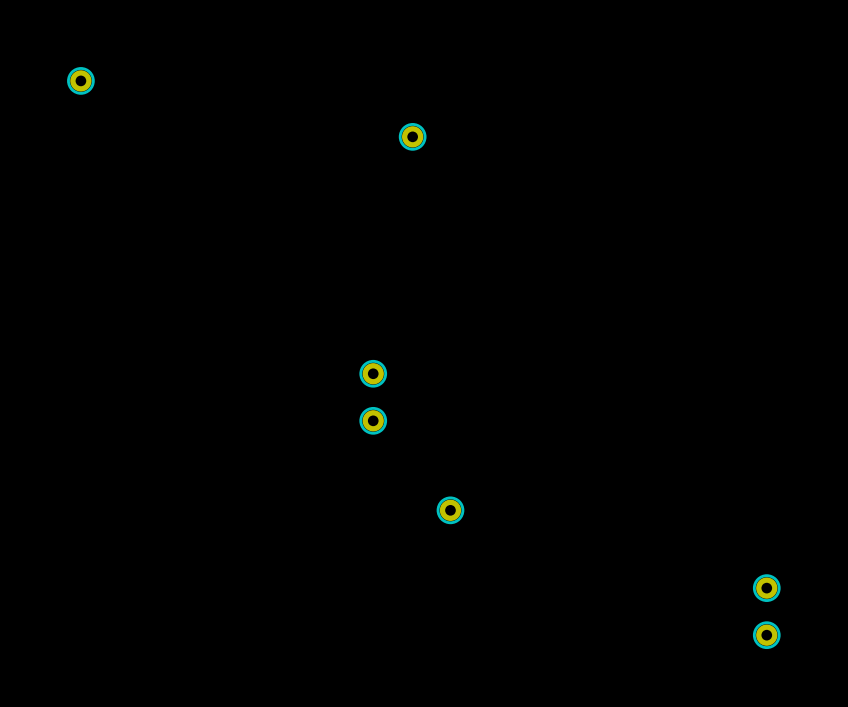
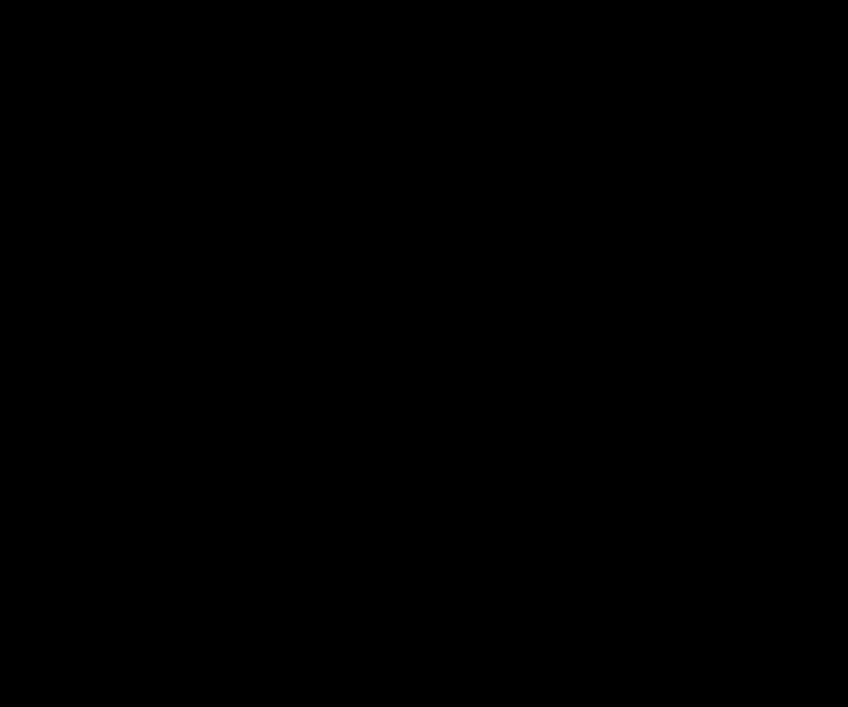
part: (80, 80) -> none
part: (412, 136) -> none
part: (373, 373) -> none
part: (373, 420) -> none
part: (450, 510) -> none
part: (766, 588) -> none
part: (766, 635) -> none

